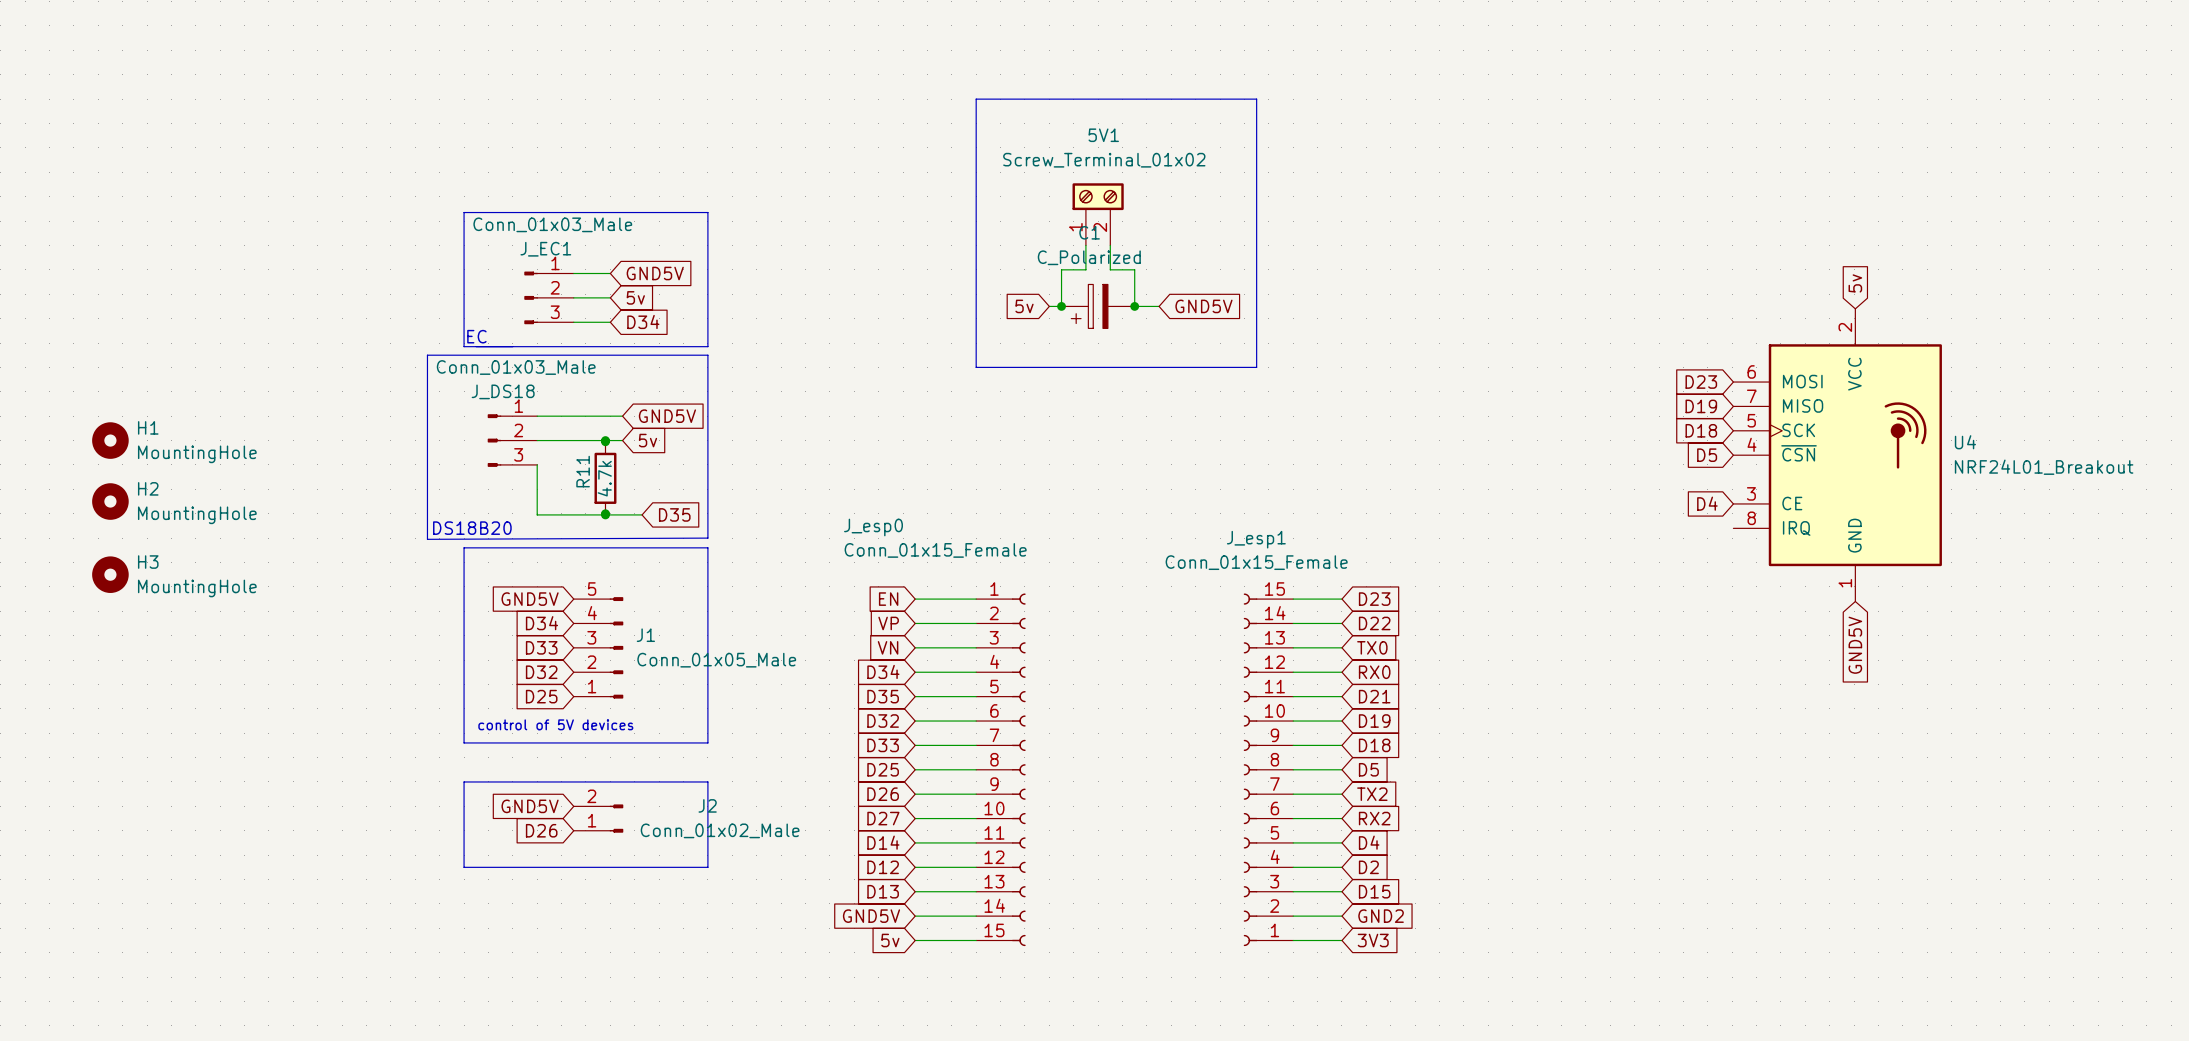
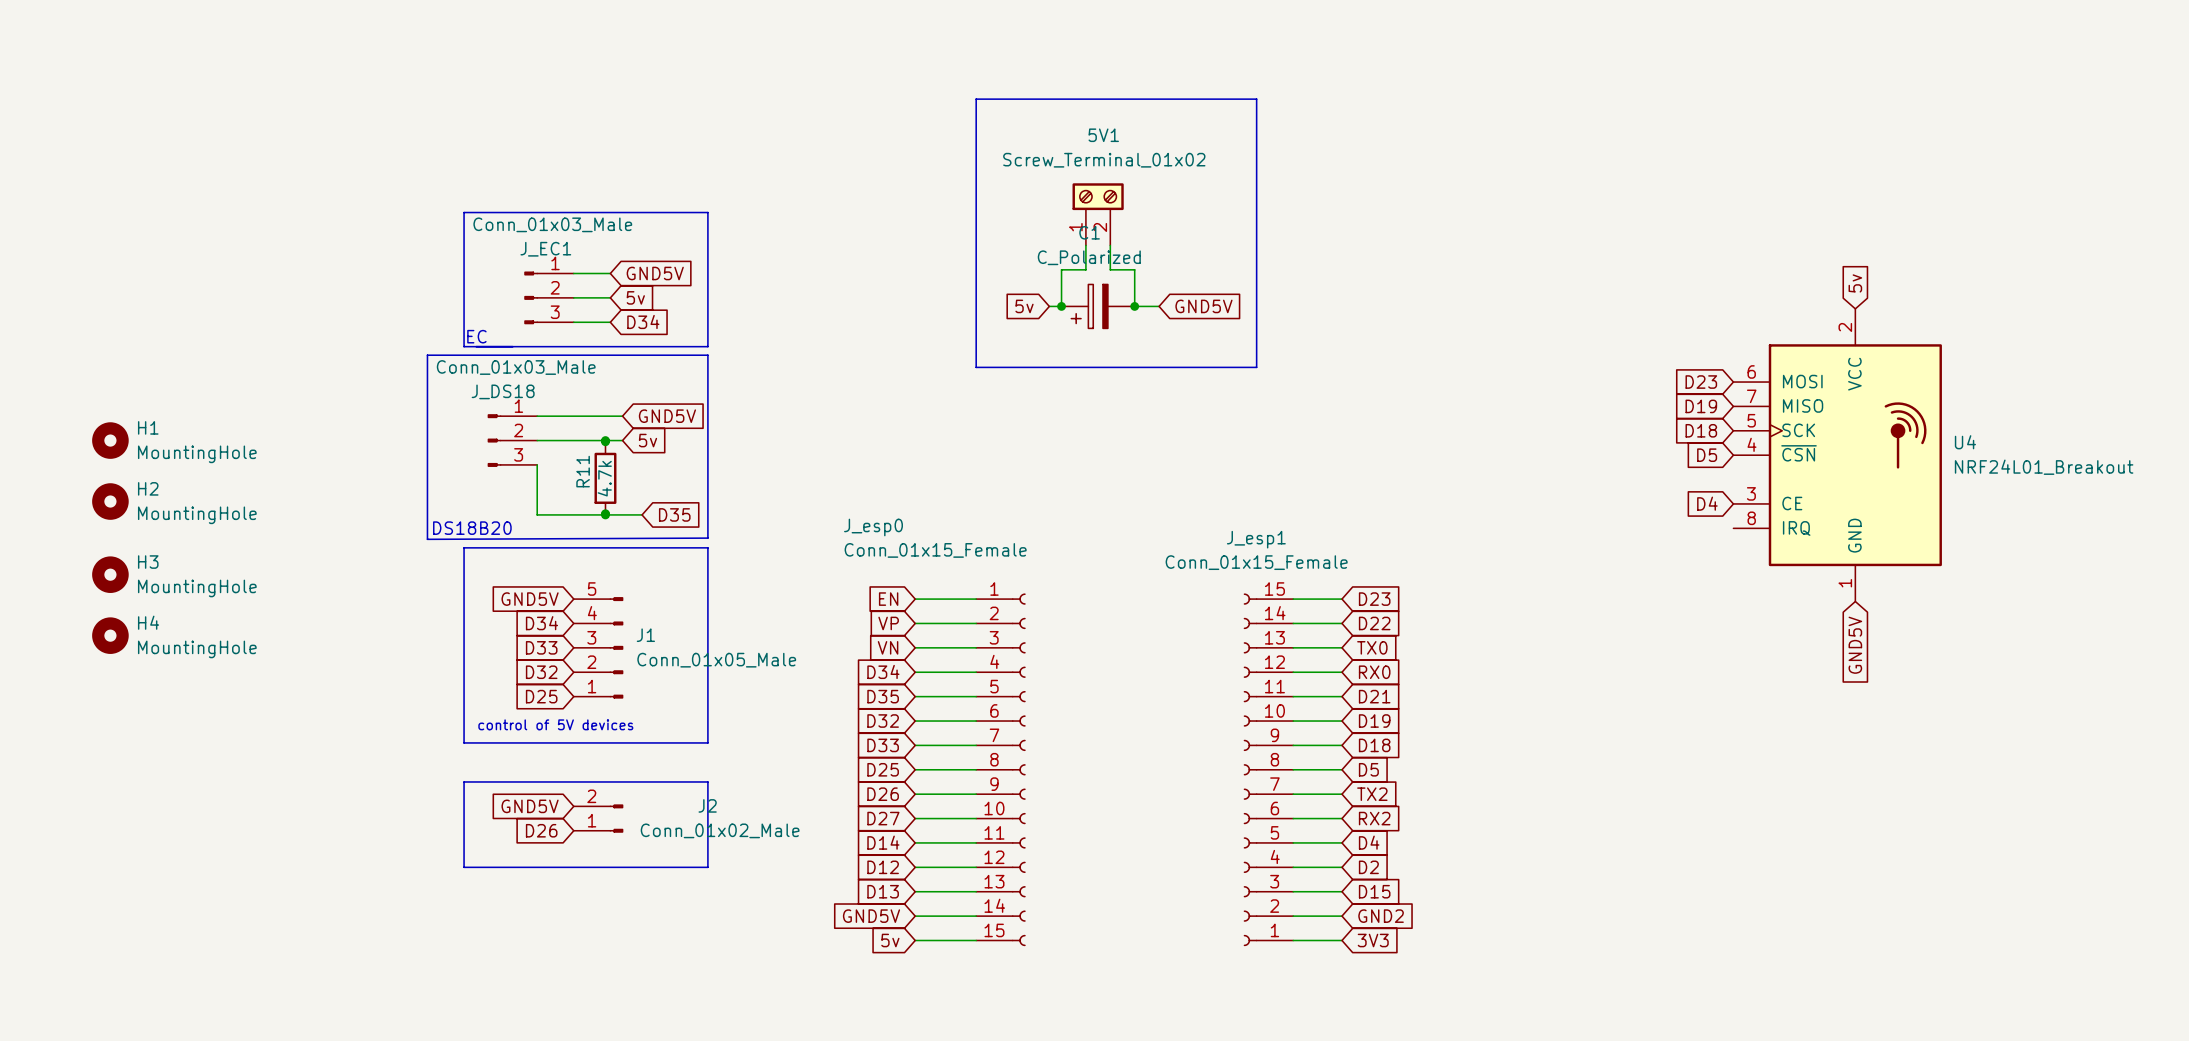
H4: none -> MountingHole (110, 635)

